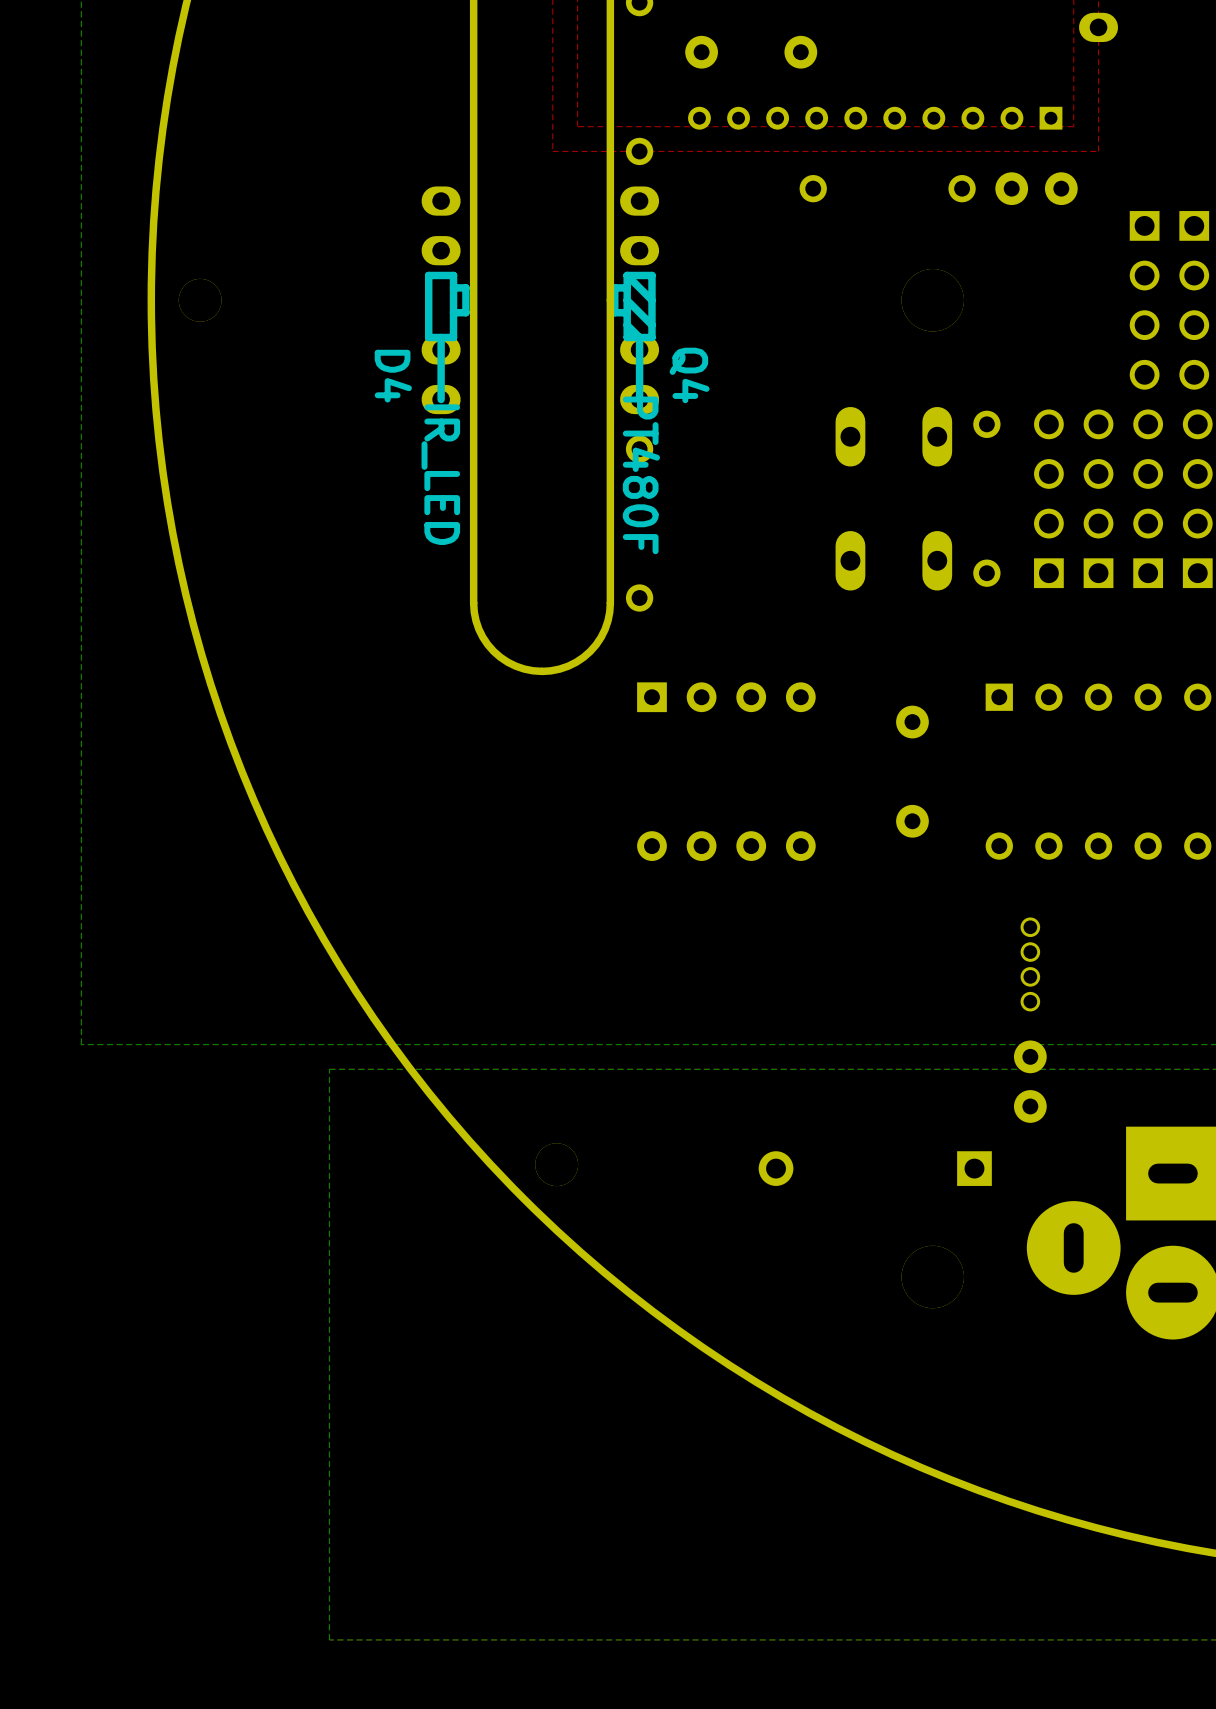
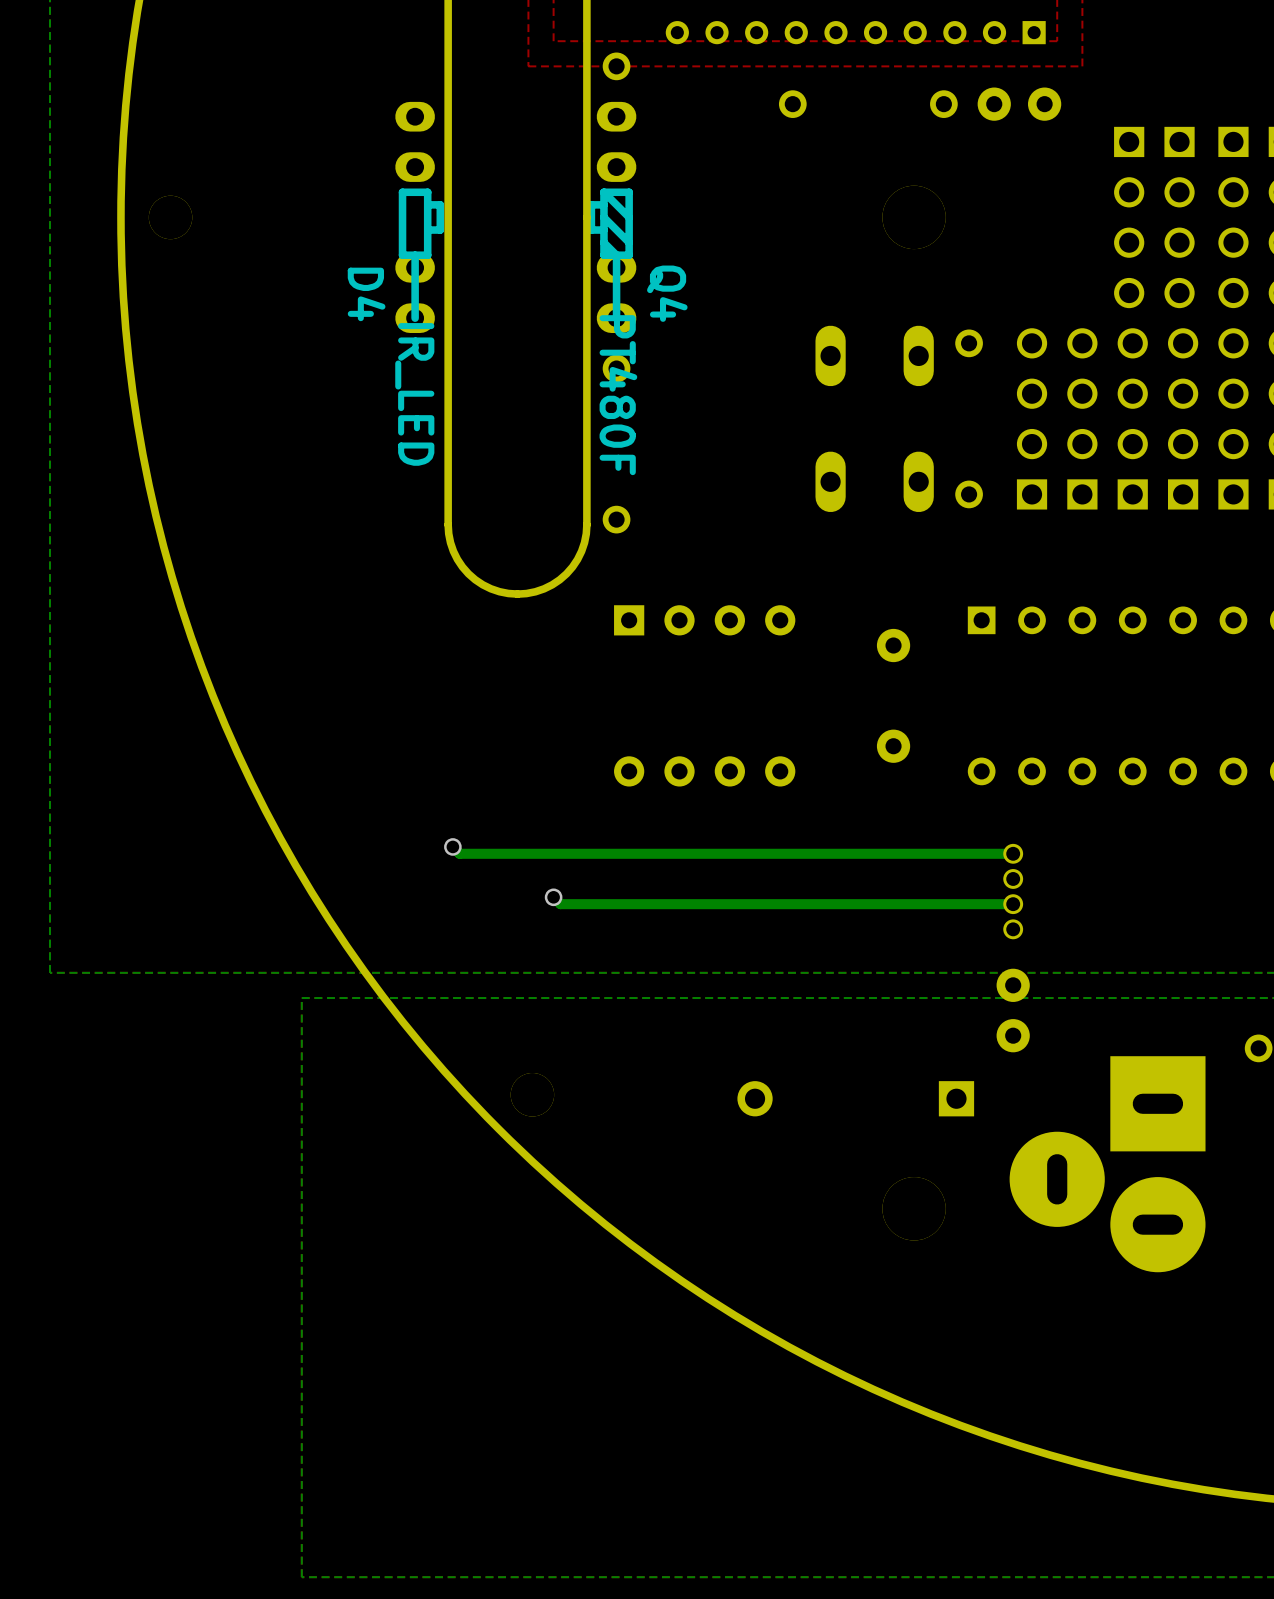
bottom track: none -> (452, 846) (459, 853) (1013, 853)
via: none -> (452, 846)
bottom track: none -> (553, 897) (560, 904) (1013, 904)
via: none -> (553, 897)

